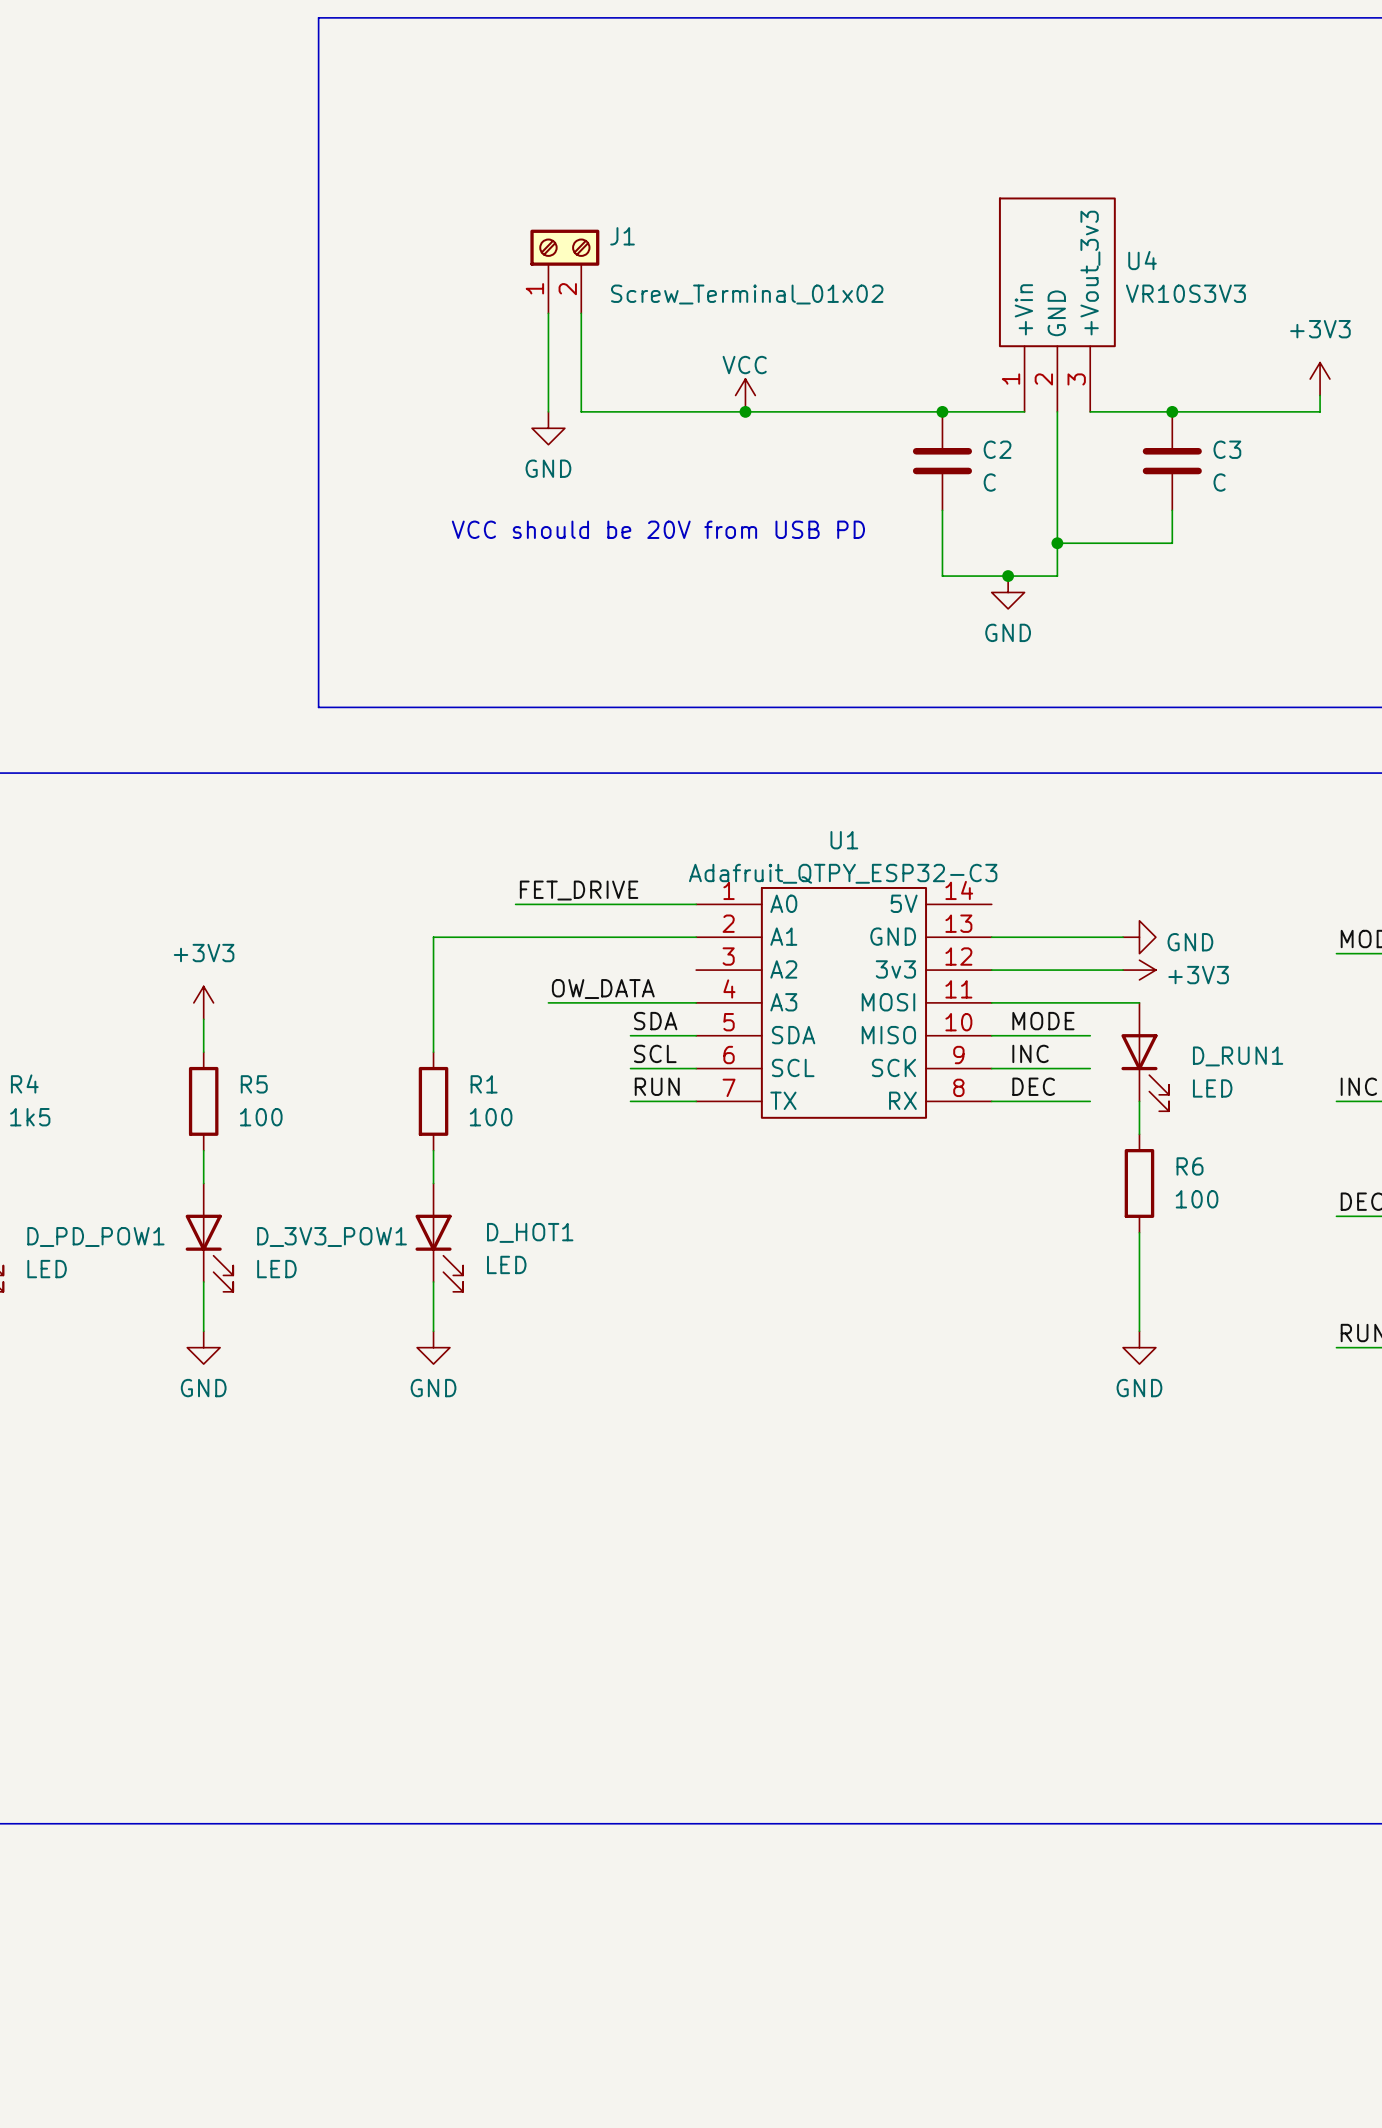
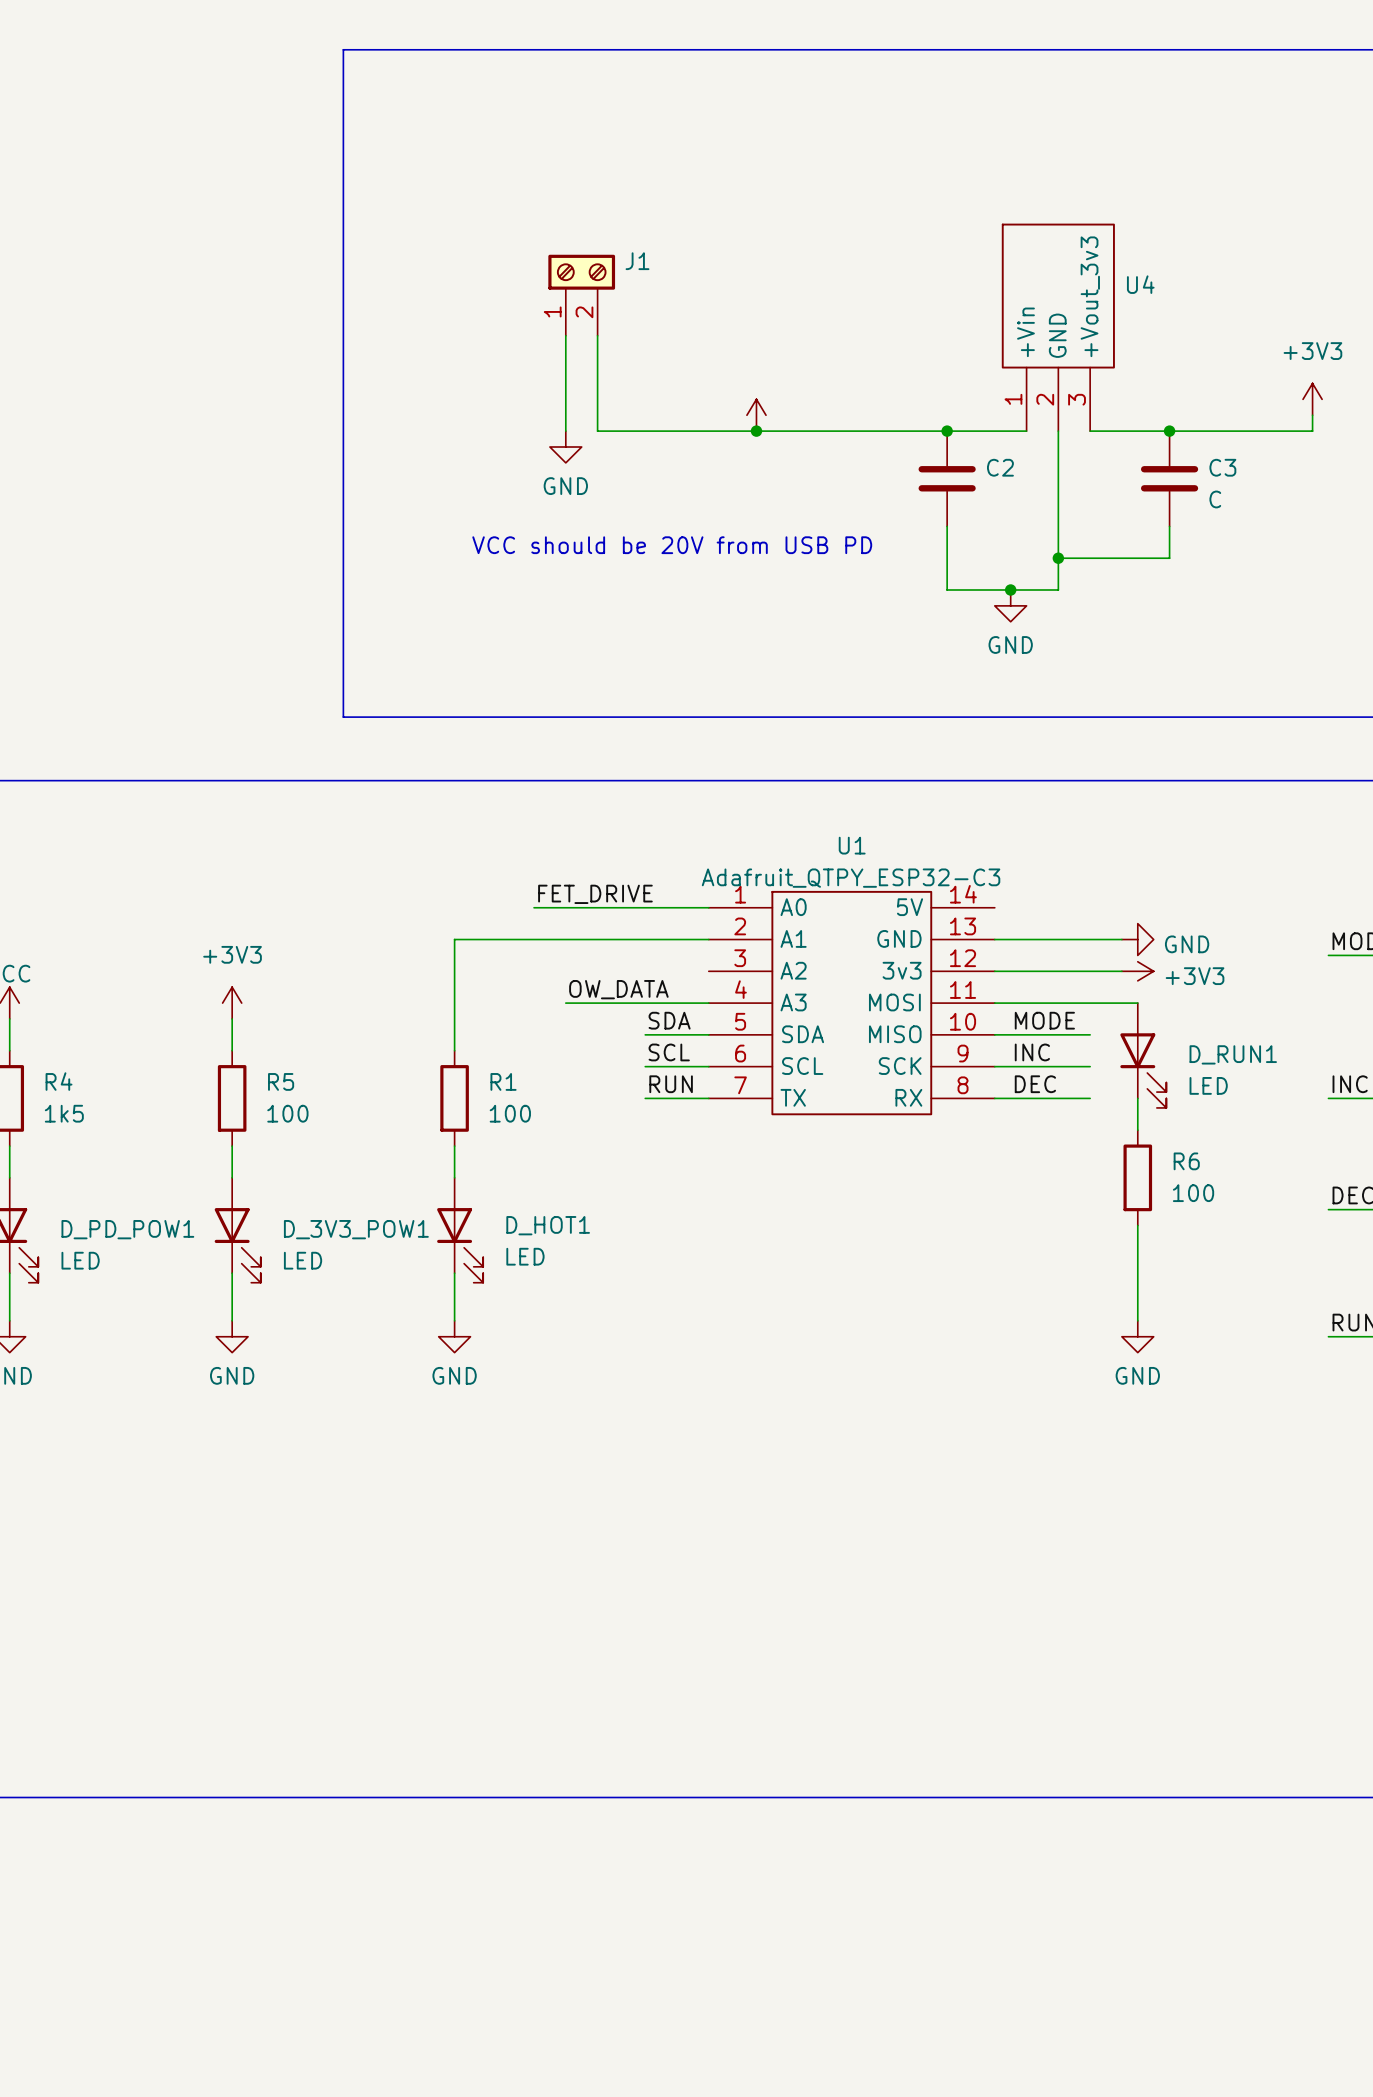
U4 value: VR10S3V3 (1185, 293) -> none
J1 value: Screw_Terminal_01x02 (747, 294) -> none
power symbol text: VCC (744, 365) -> none
C2 value: C (989, 482) -> none

